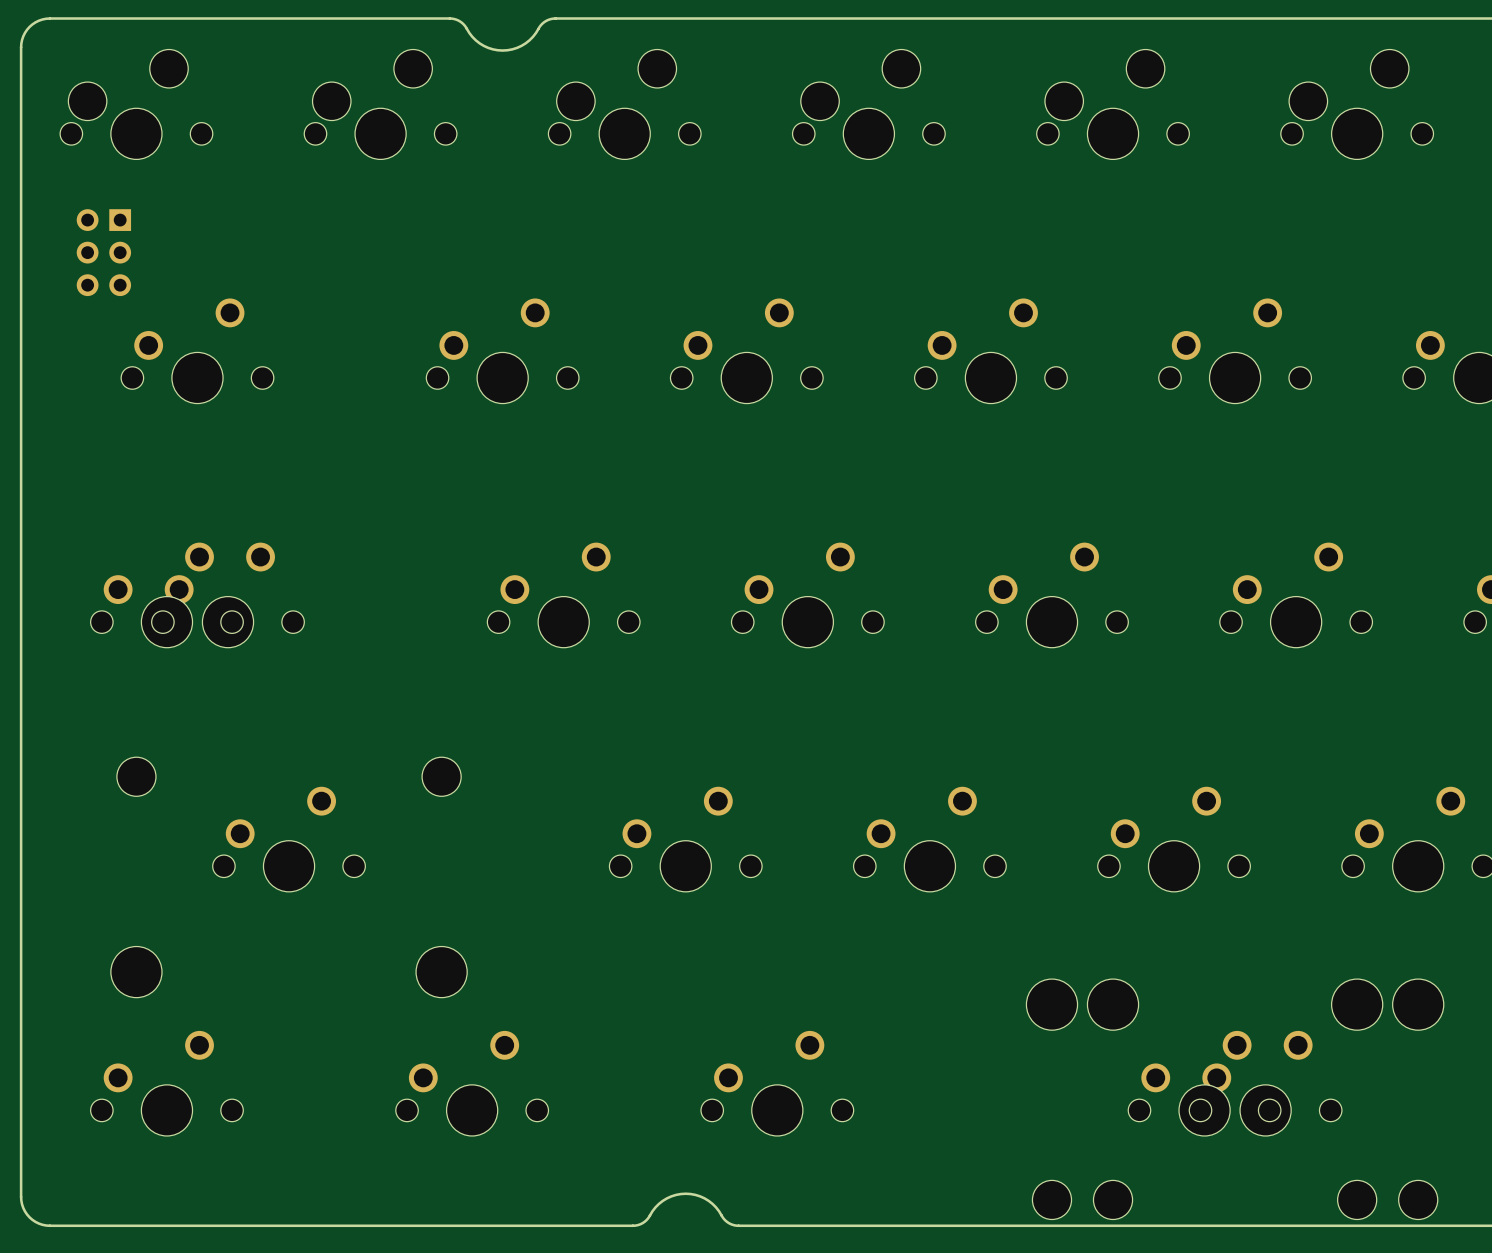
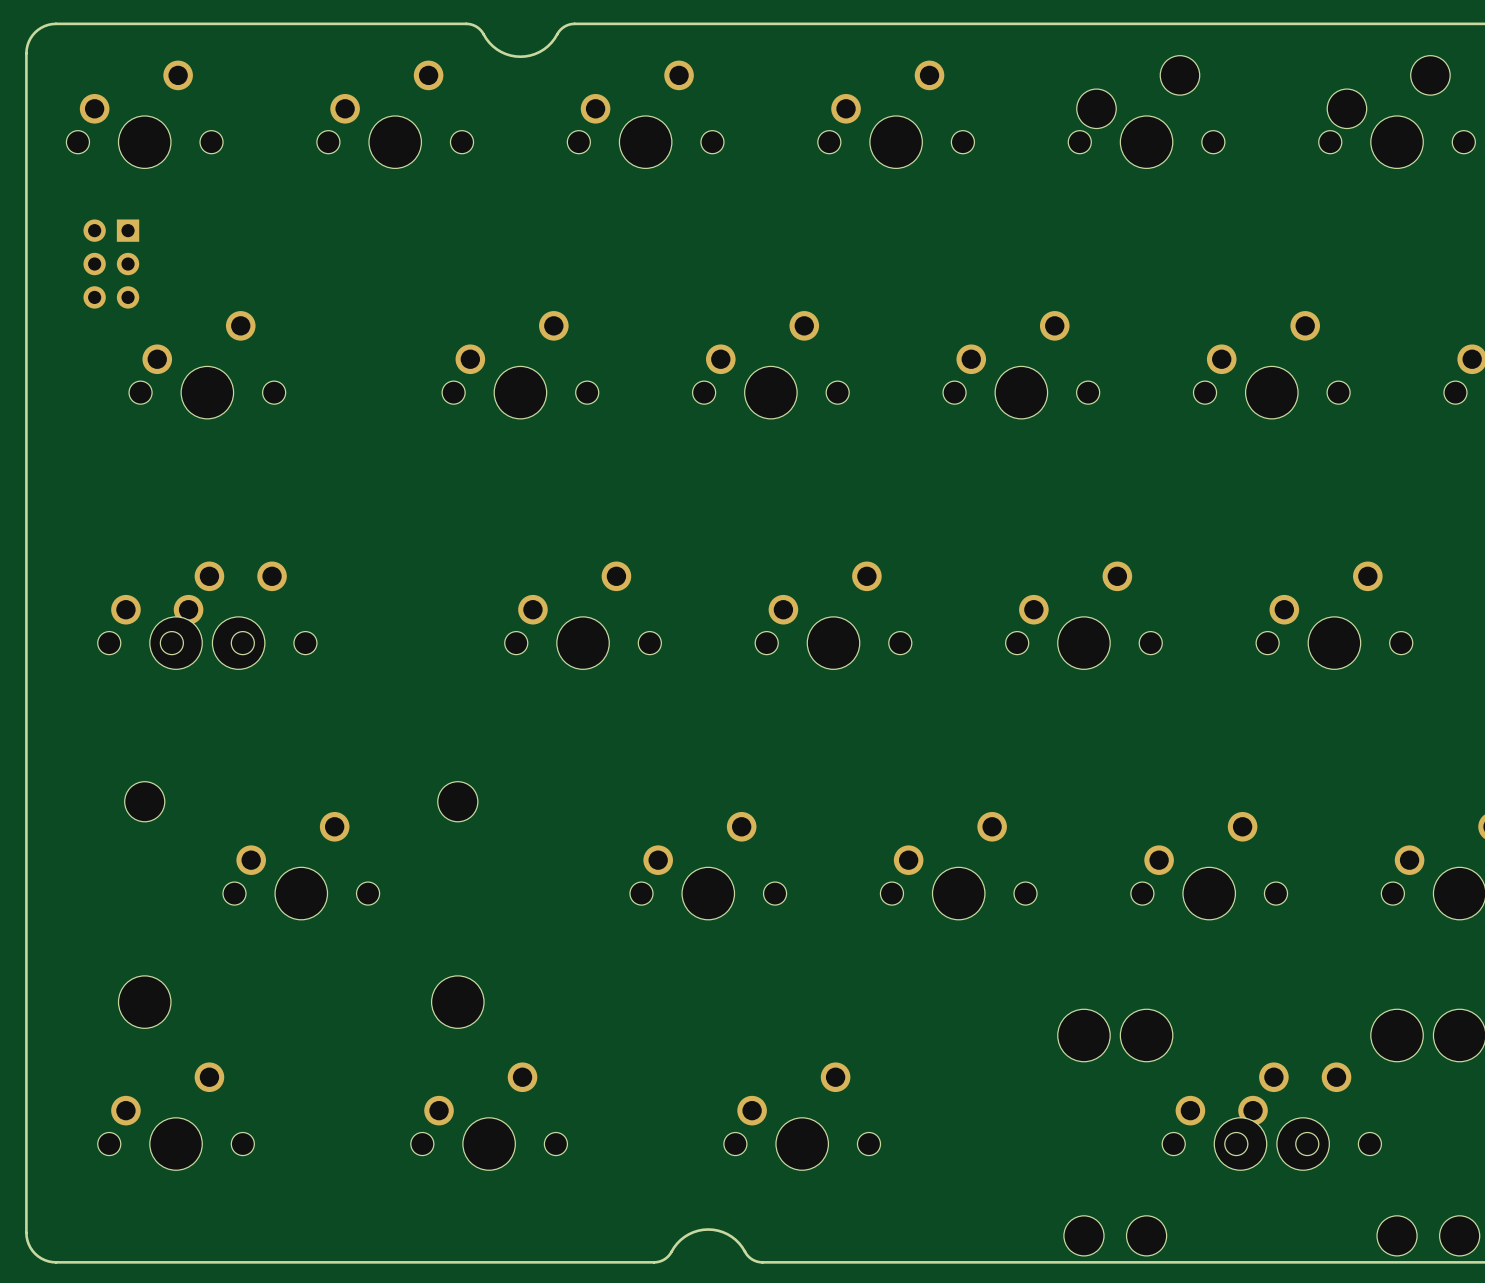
part footprint: [60, 49, 213, 160] -> [66, 60, 224, 169]
part footprint: [304, 49, 457, 160] -> [316, 60, 474, 169]
part footprint: [548, 49, 702, 160] -> [567, 60, 724, 169]
part footprint: [792, 49, 946, 160] -> [817, 60, 975, 169]

